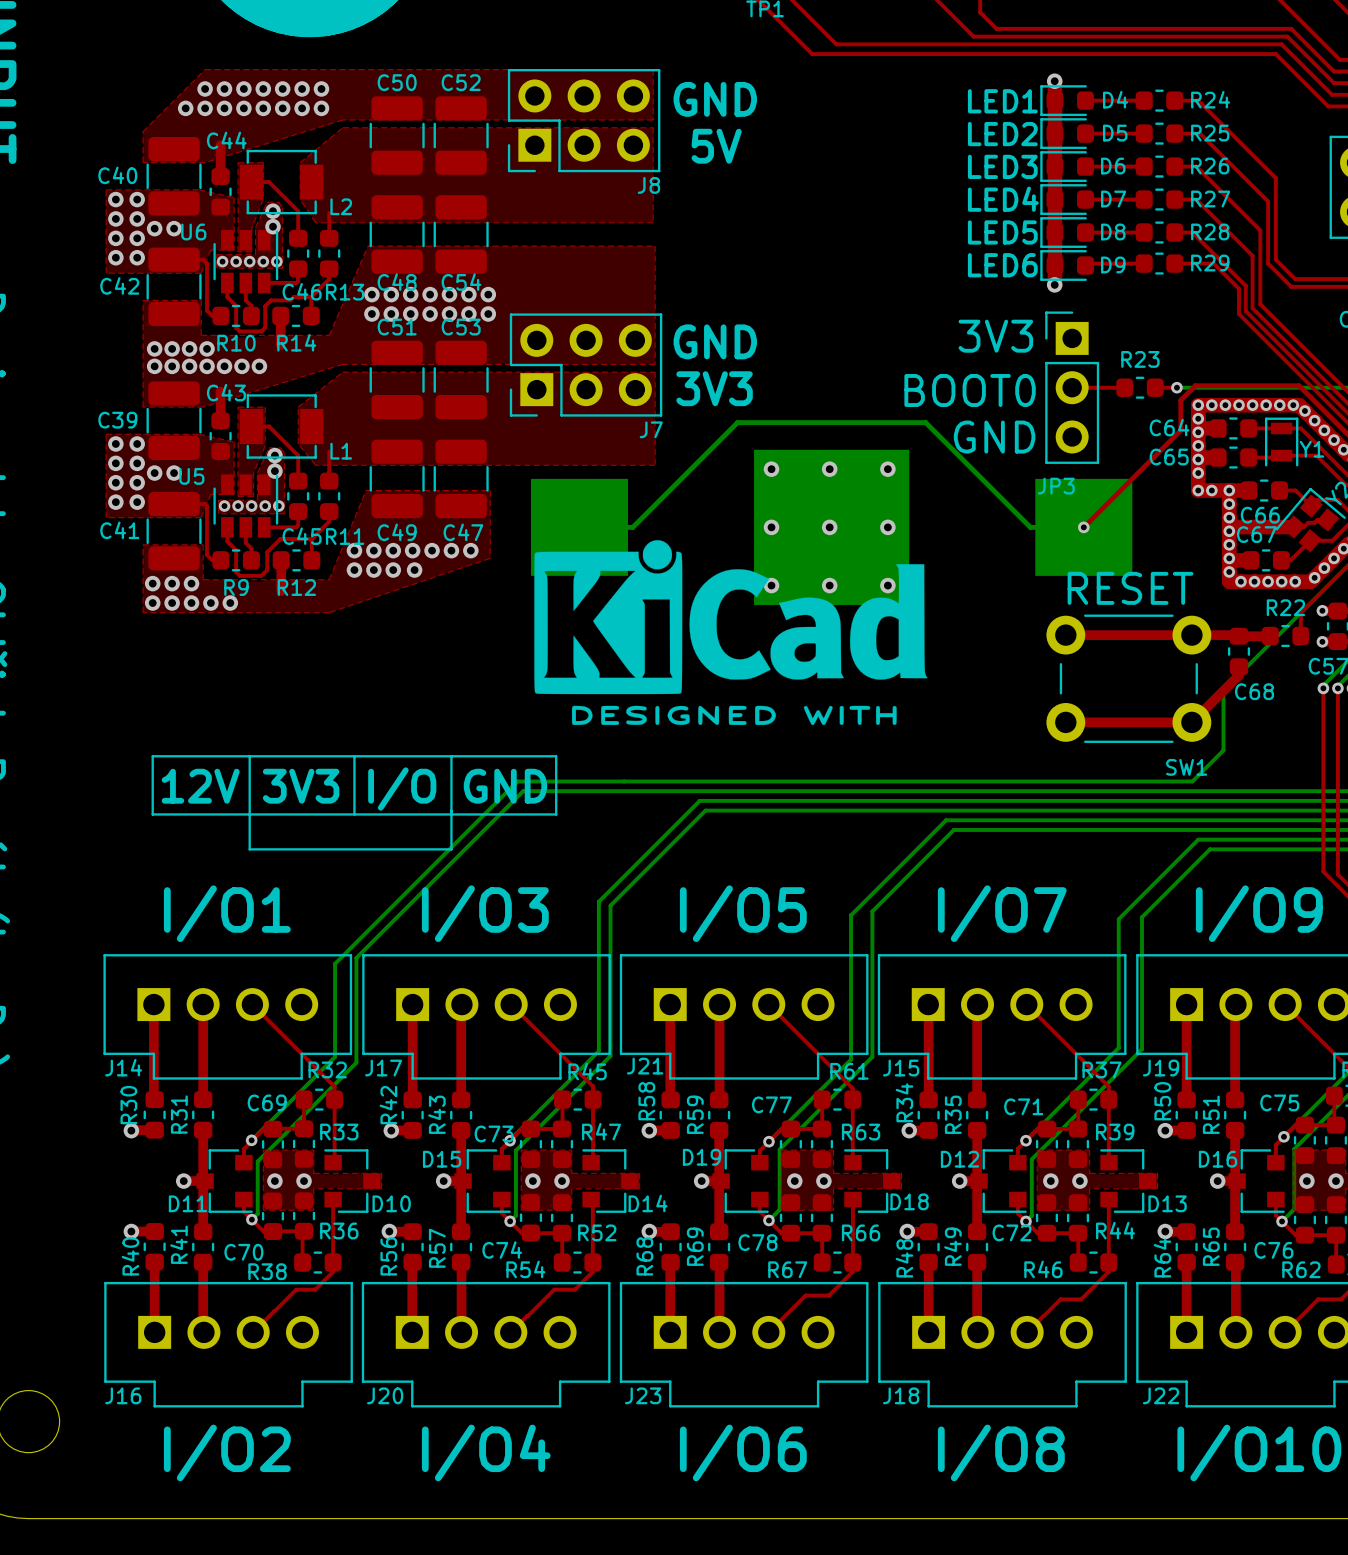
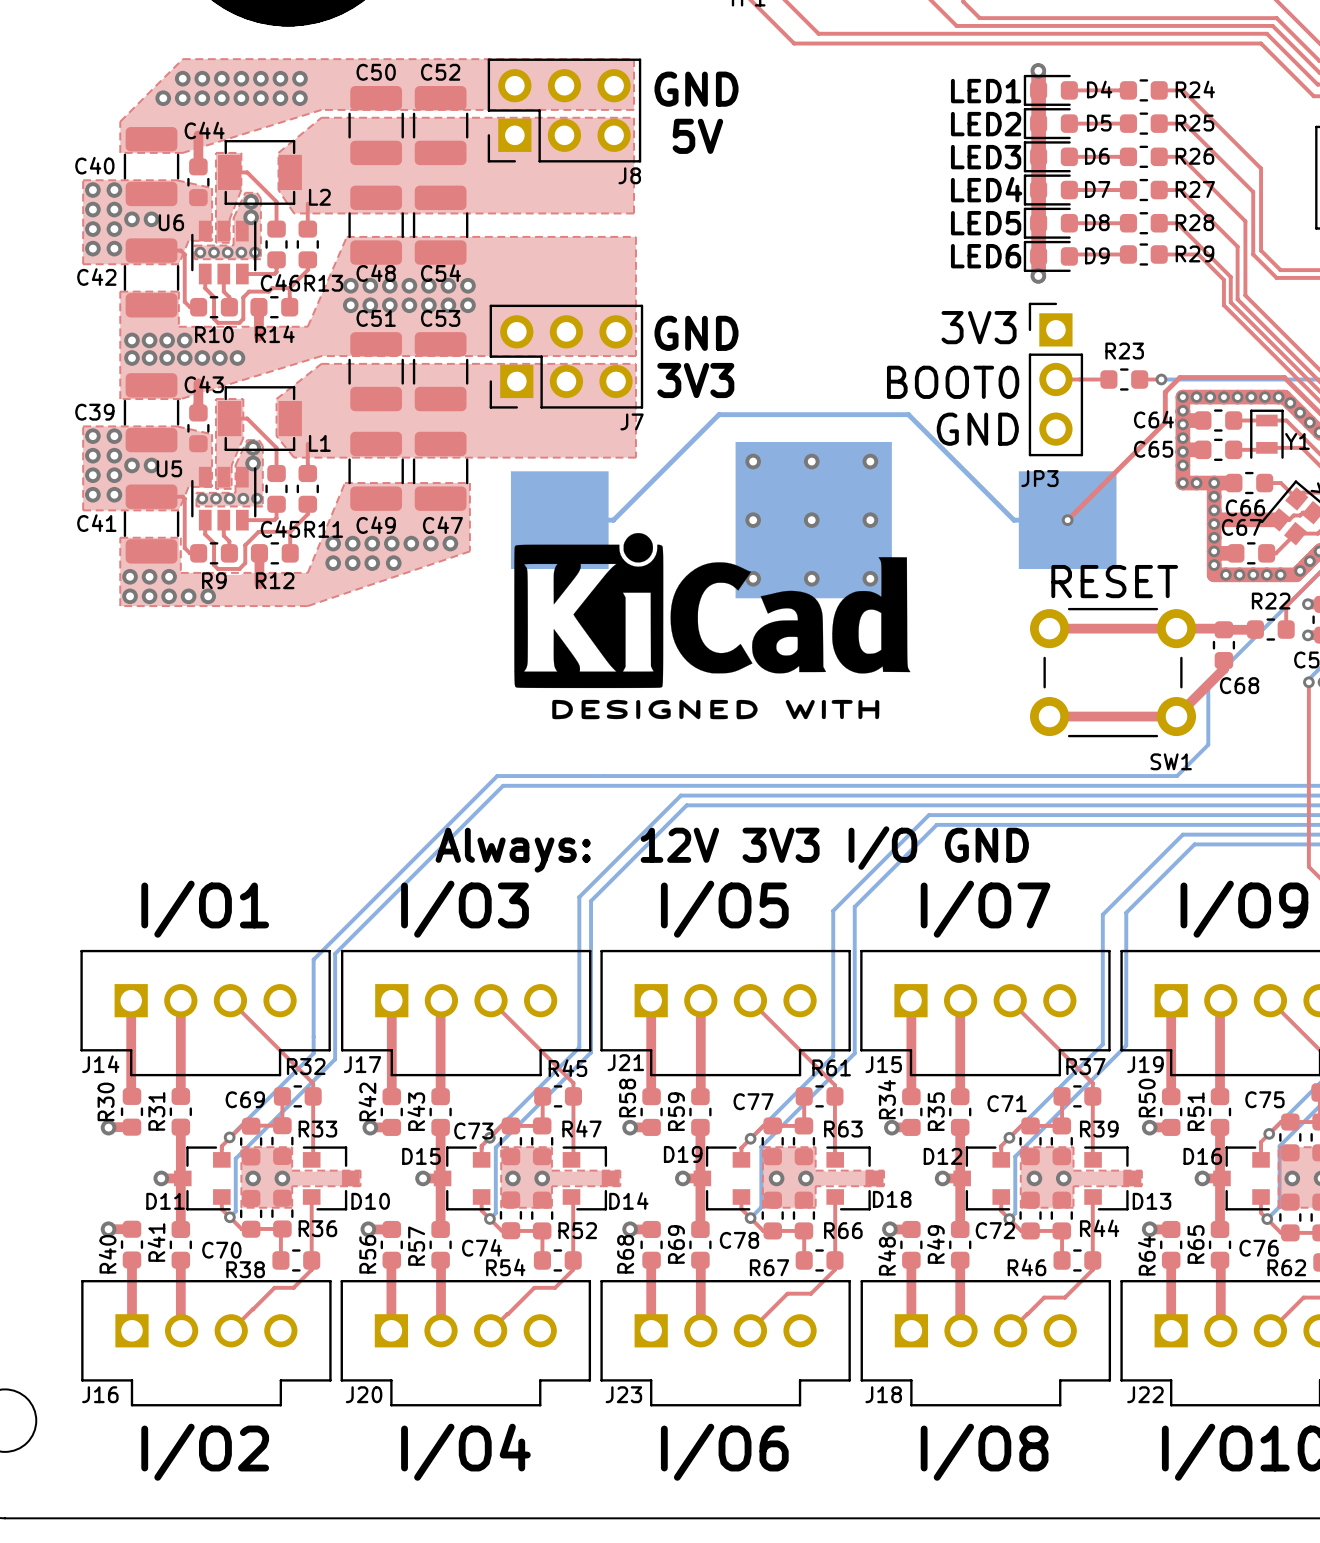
line: (152, 756) (556, 756) (556, 814) (152, 814) (152, 756) -> none
line: (249, 756) (249, 849) (451, 849) (451, 756) -> none
line: (354, 756) (354, 814) -> none
text: 12V 3V3 I/O GND (354, 788) -> none
text: none -> Always: 12V 3V3 I/O GND (732, 849)

